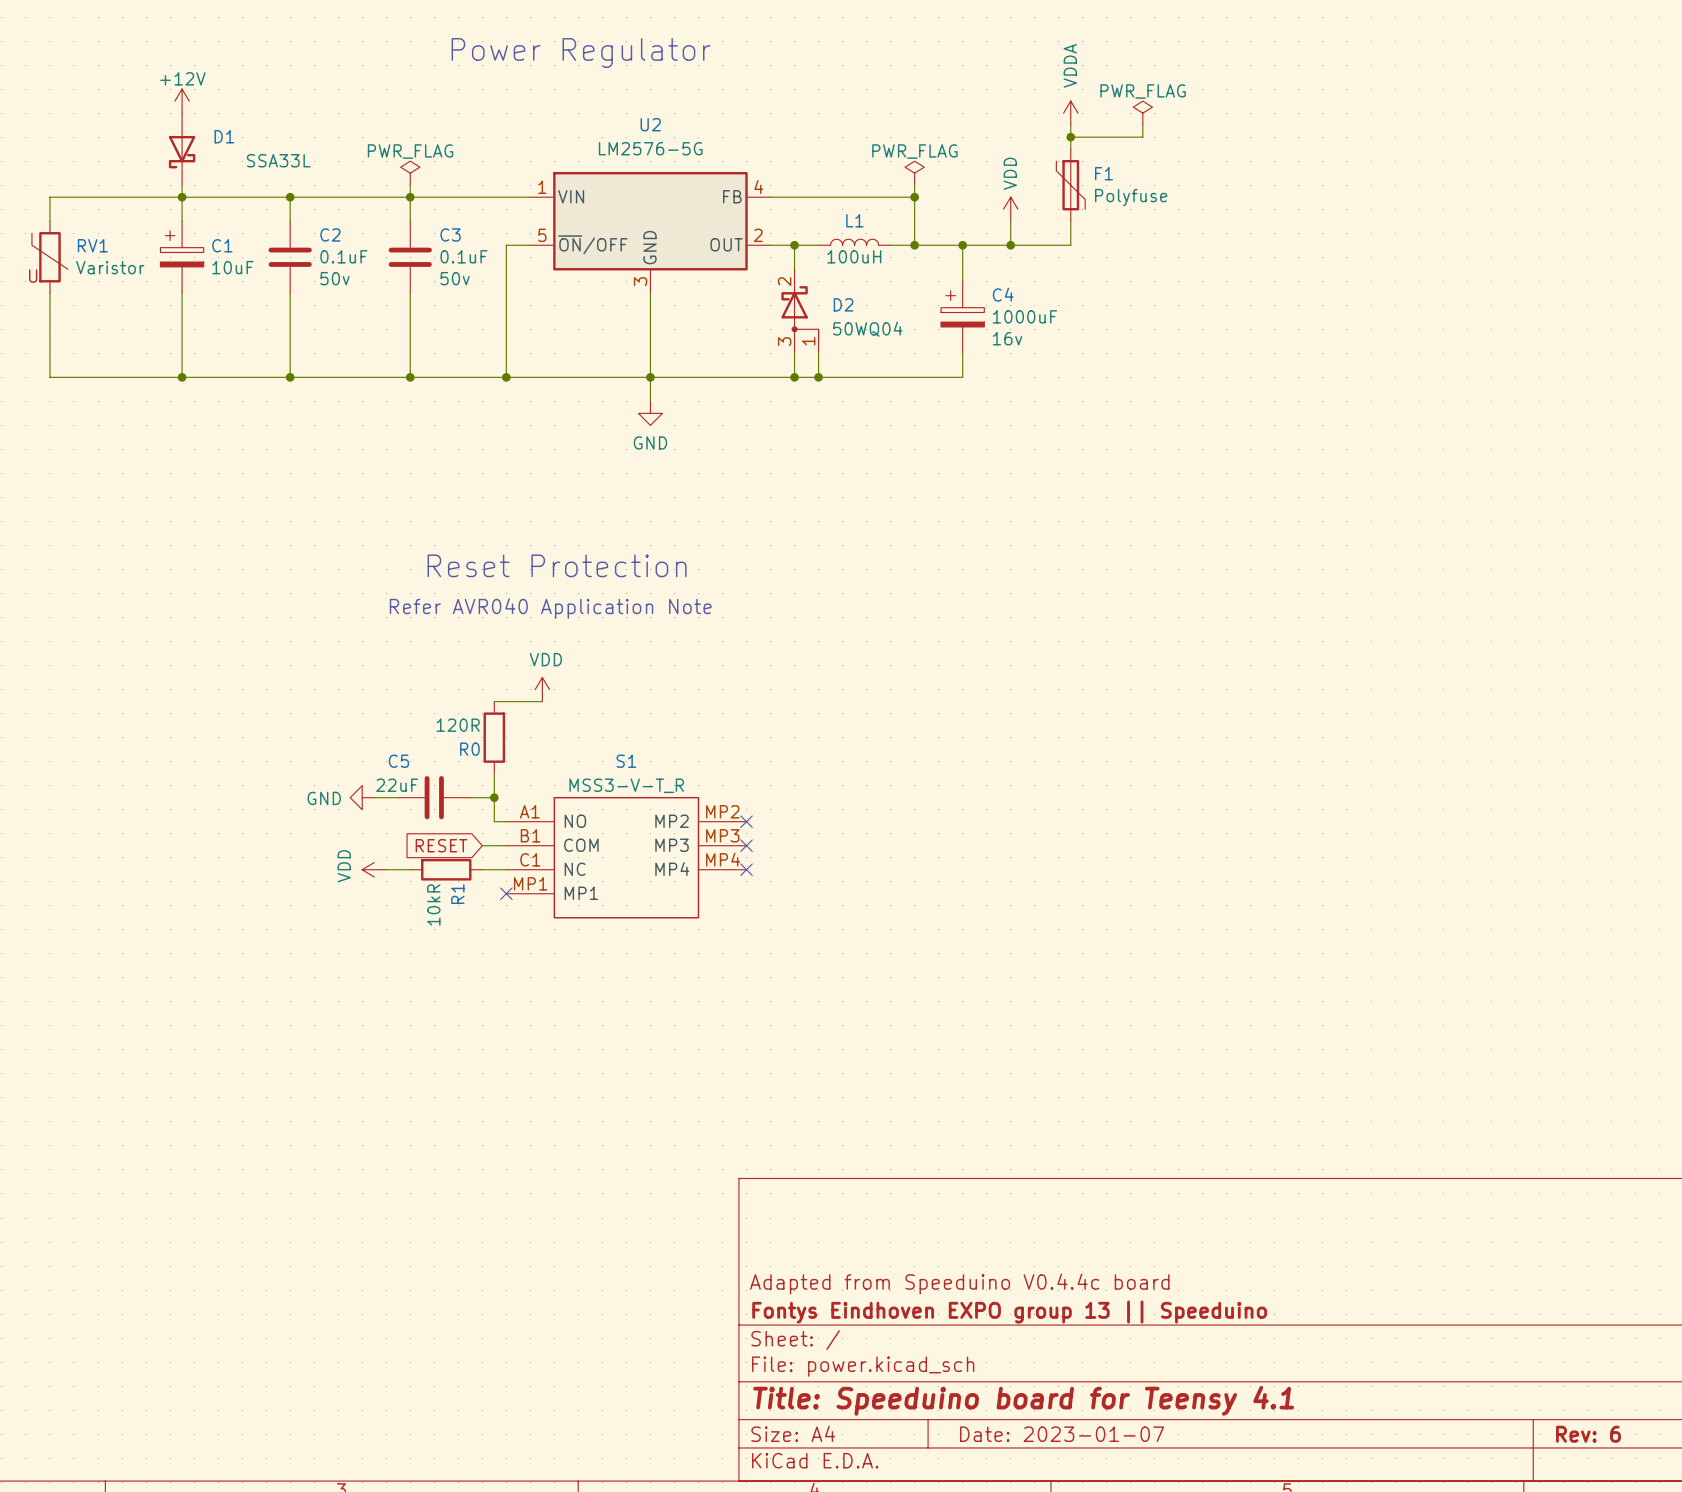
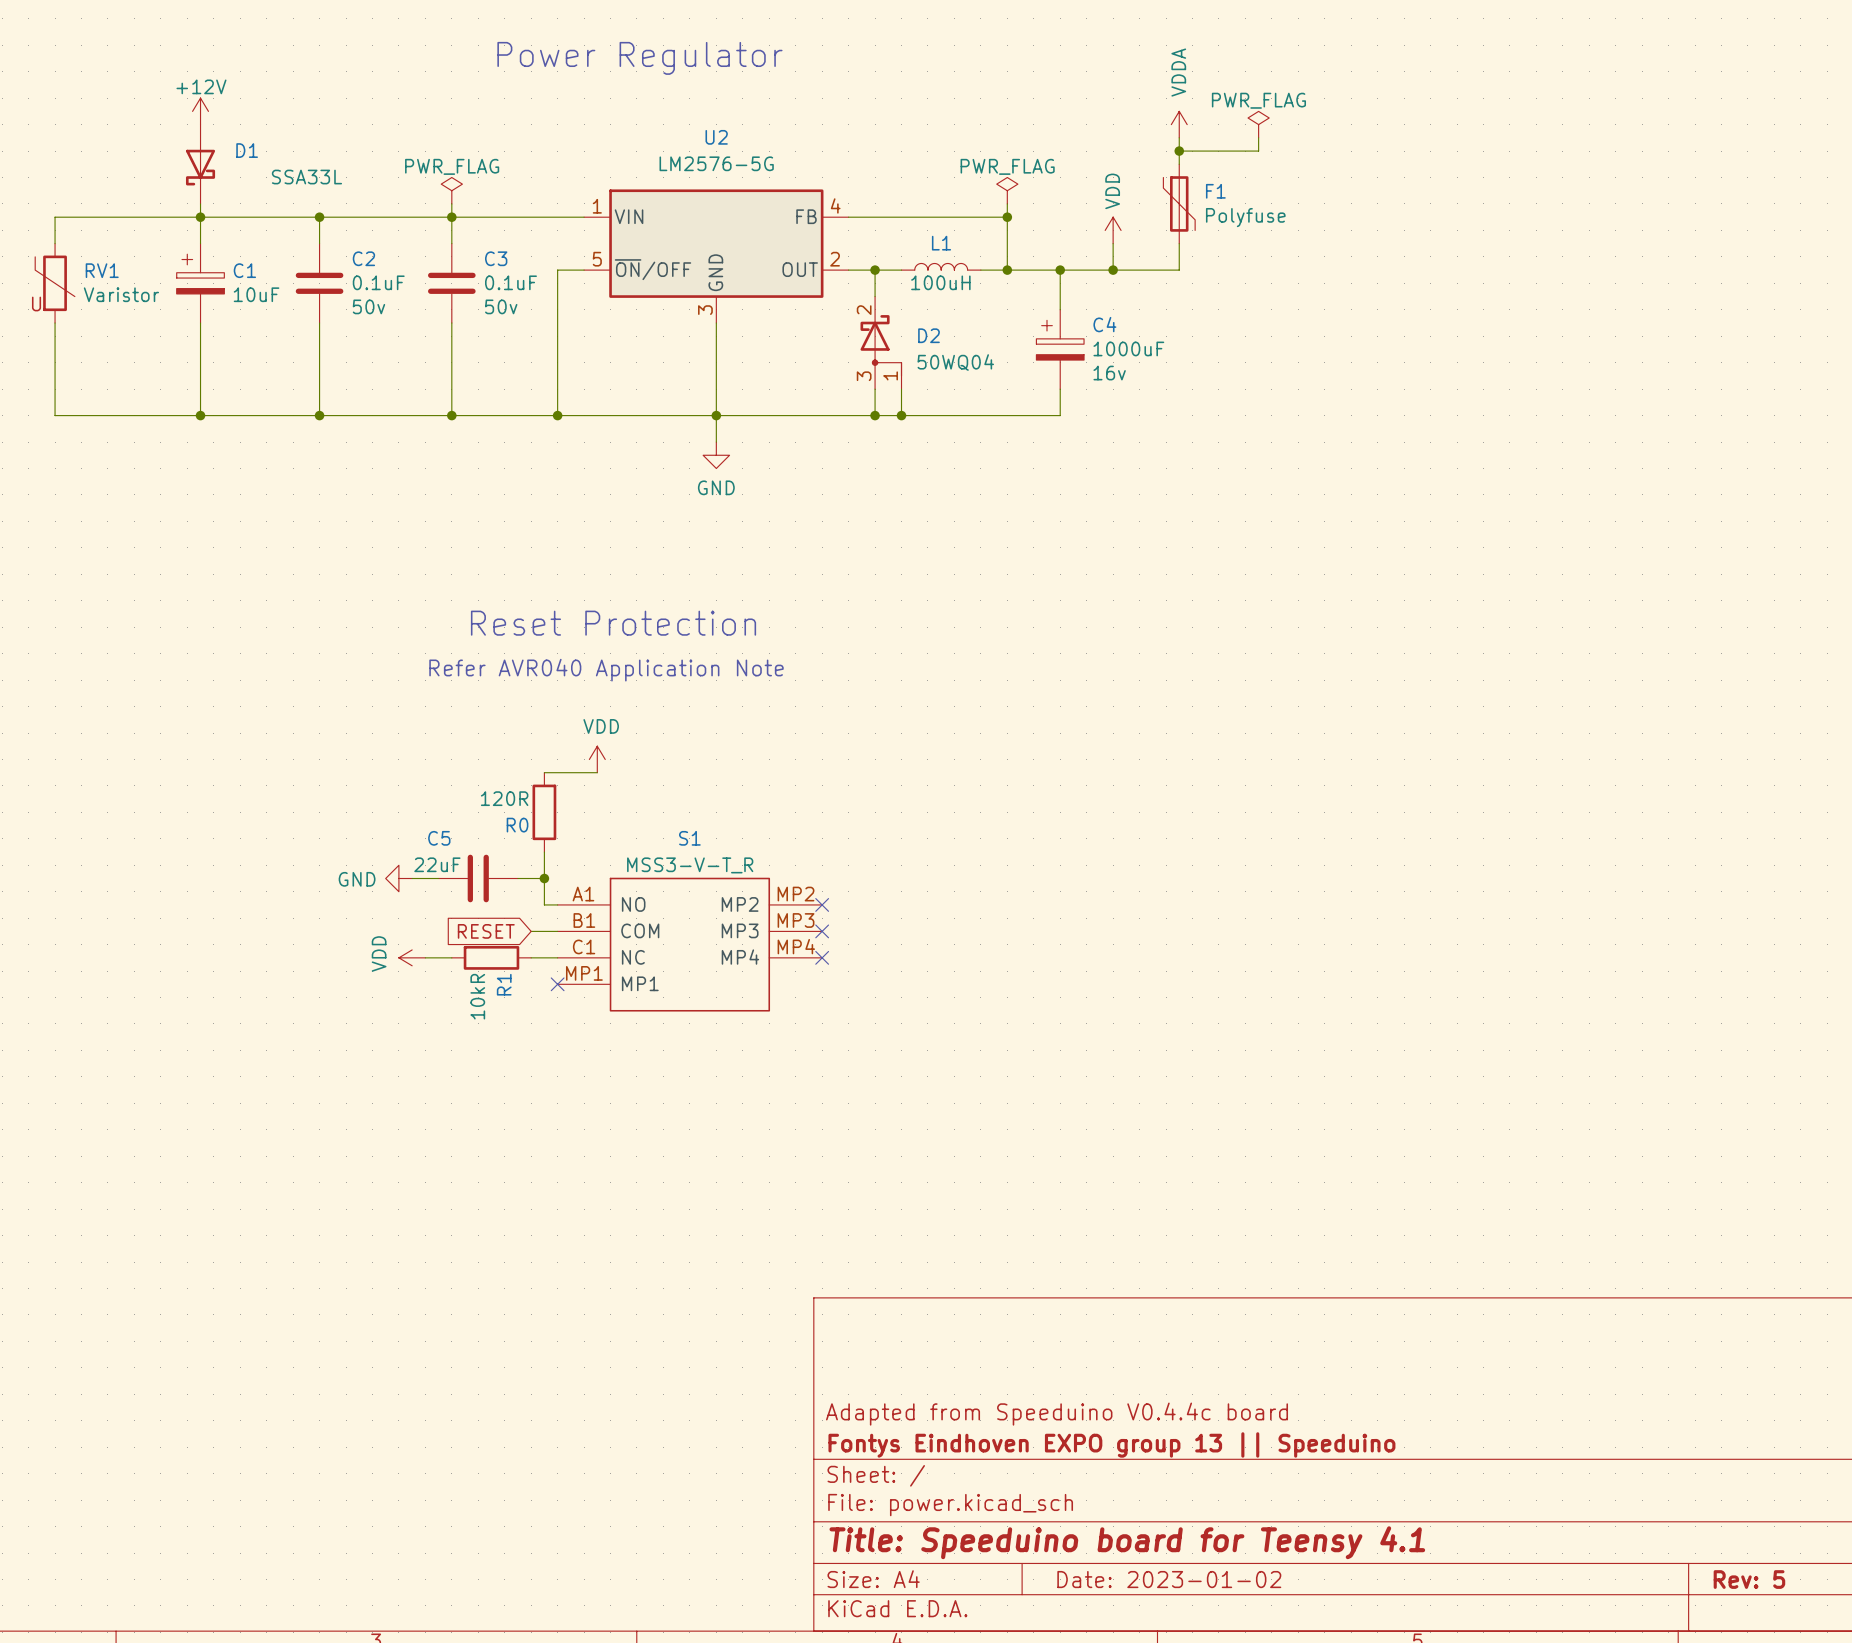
title block: Date: 2023-01-07 (1062, 1434) -> Date: 2023-01-02 (1169, 1579)
title block: Rev: 6 (1588, 1434) -> Rev: 5 (1749, 1579)

